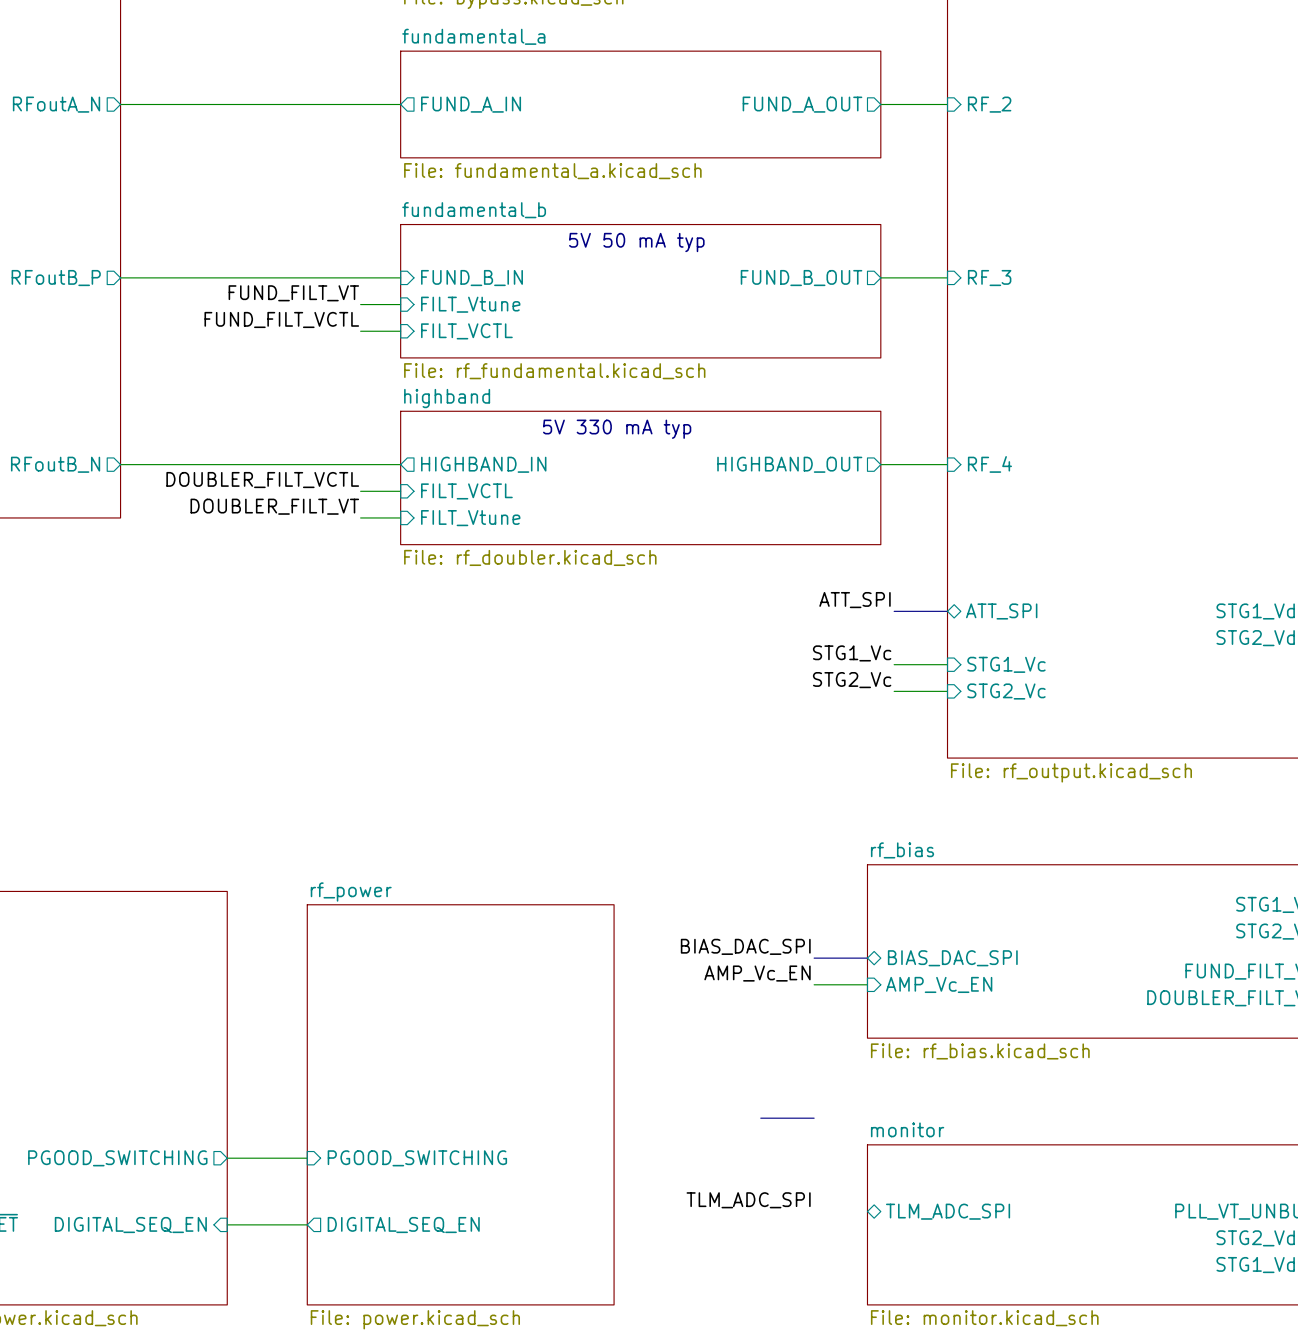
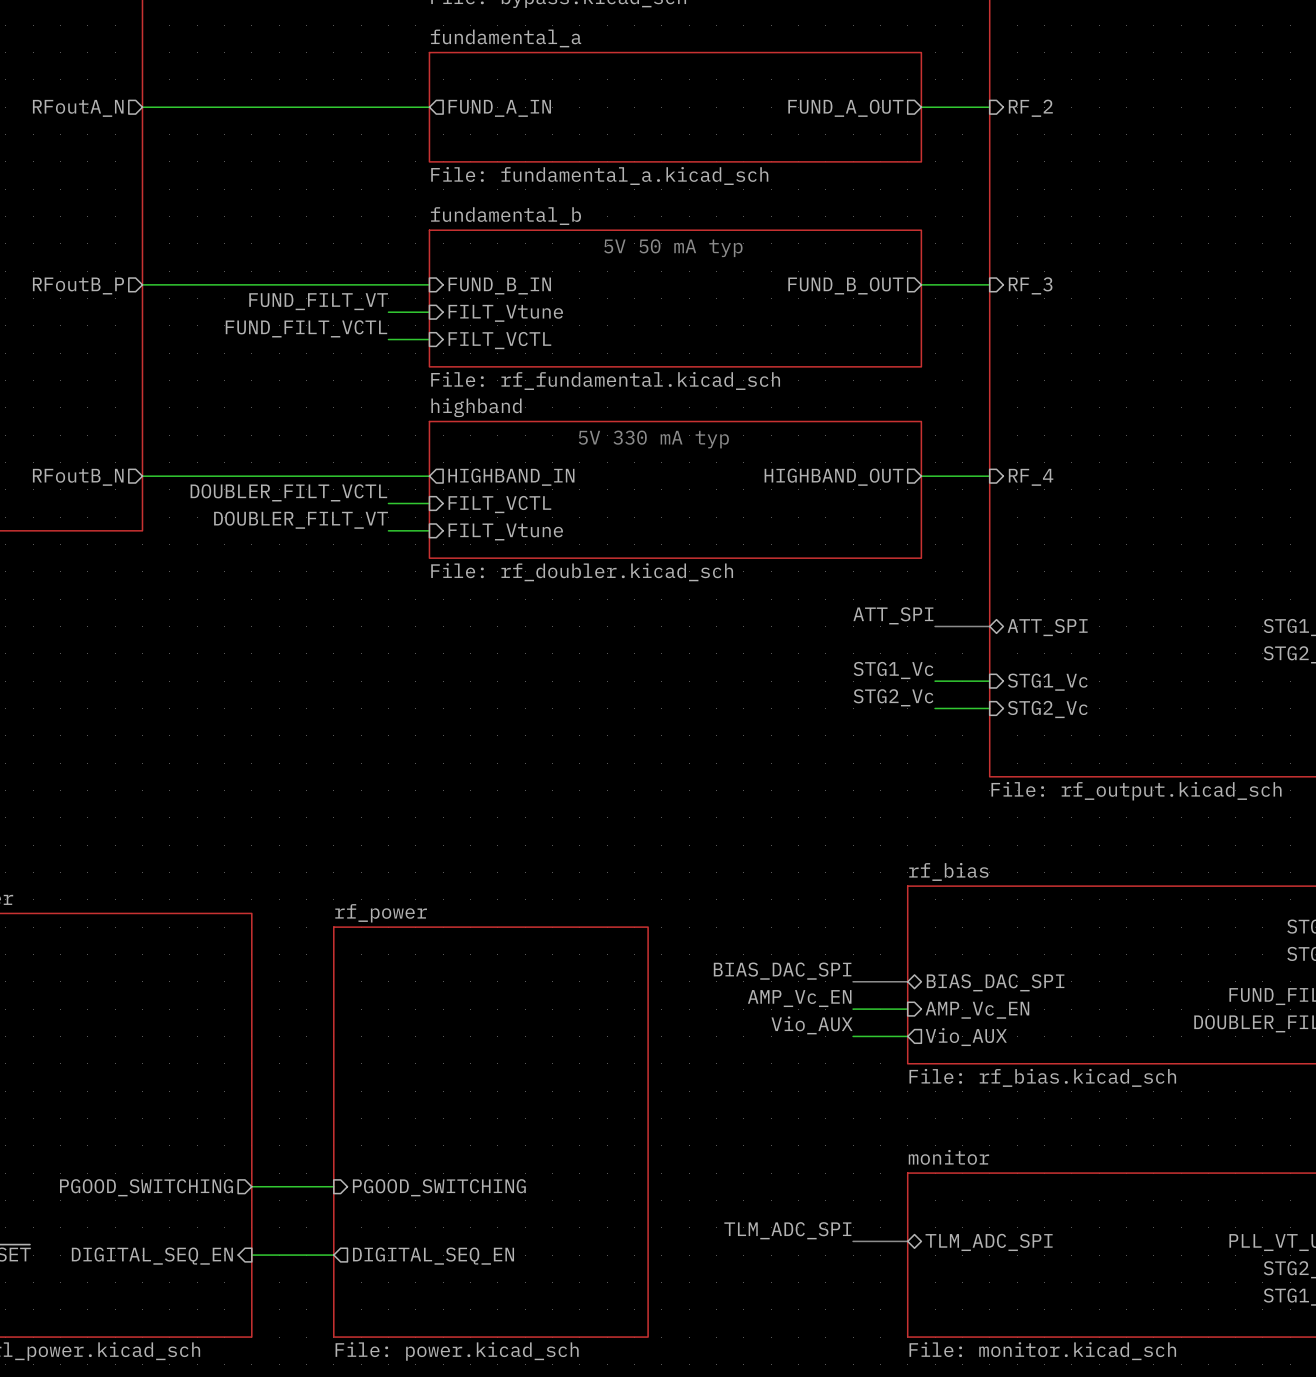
label: none -> Vio_AUX (812, 1025)
wire: none -> (853, 1036) (907, 1036)
sheet pin: none -> Vio_AUX (966, 1037)
bus: (760, 1118) (814, 1118) -> (853, 1241) (907, 1241)

